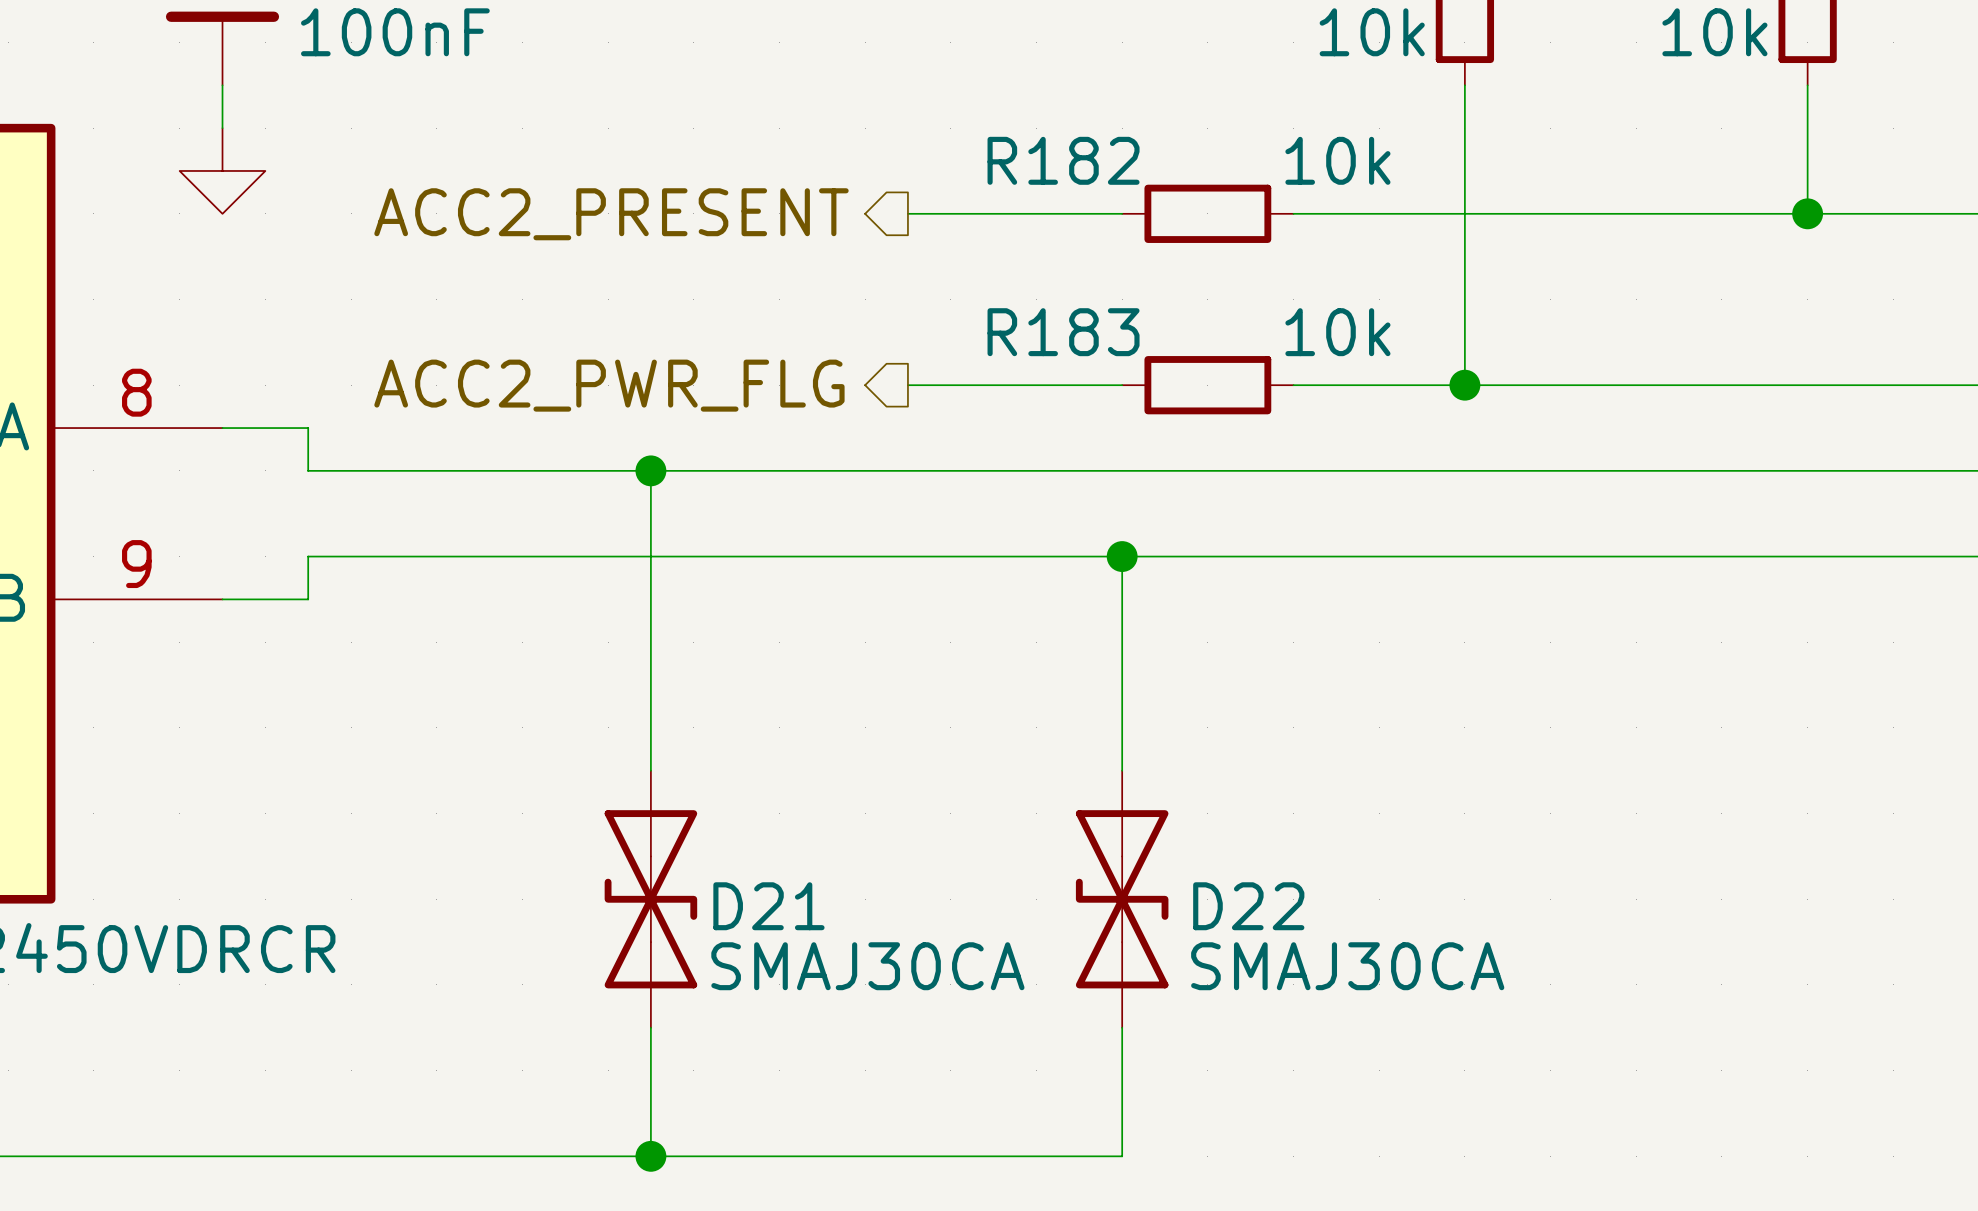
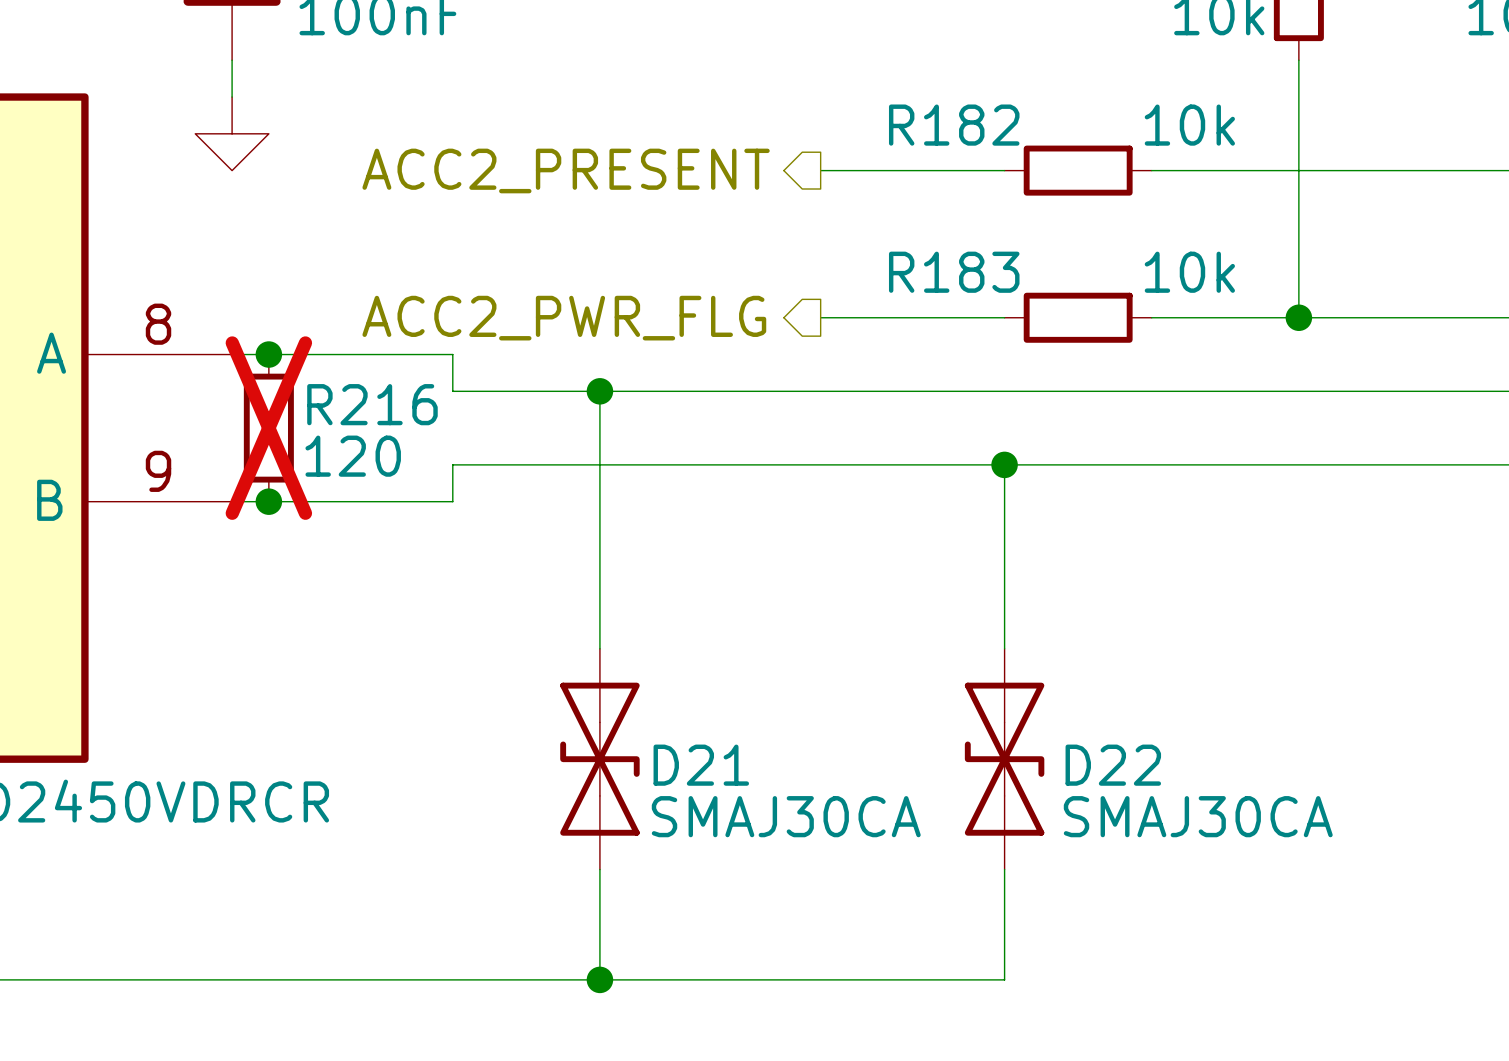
junction: none -> (268, 354)
wire: (308, 428) (308, 470) (479, 470) -> (305, 354) (452, 354) (452, 391)
R216: none -> 120 (268, 428)
wire: (479, 556) (308, 556) (308, 599) -> (452, 464) (452, 501) (305, 501)
junction: none -> (268, 501)

